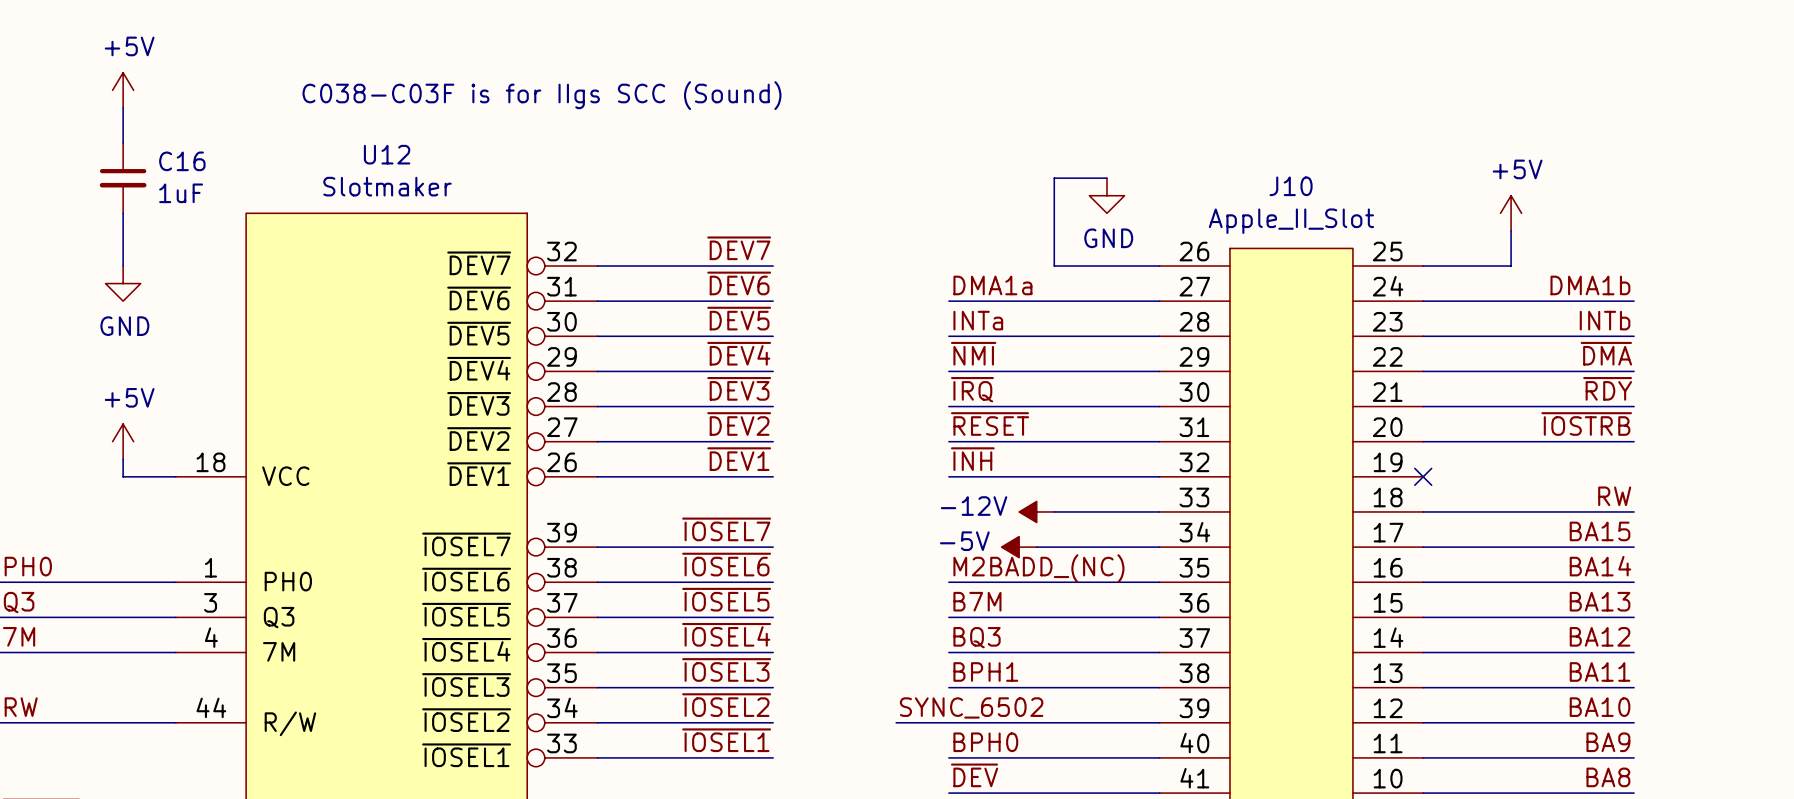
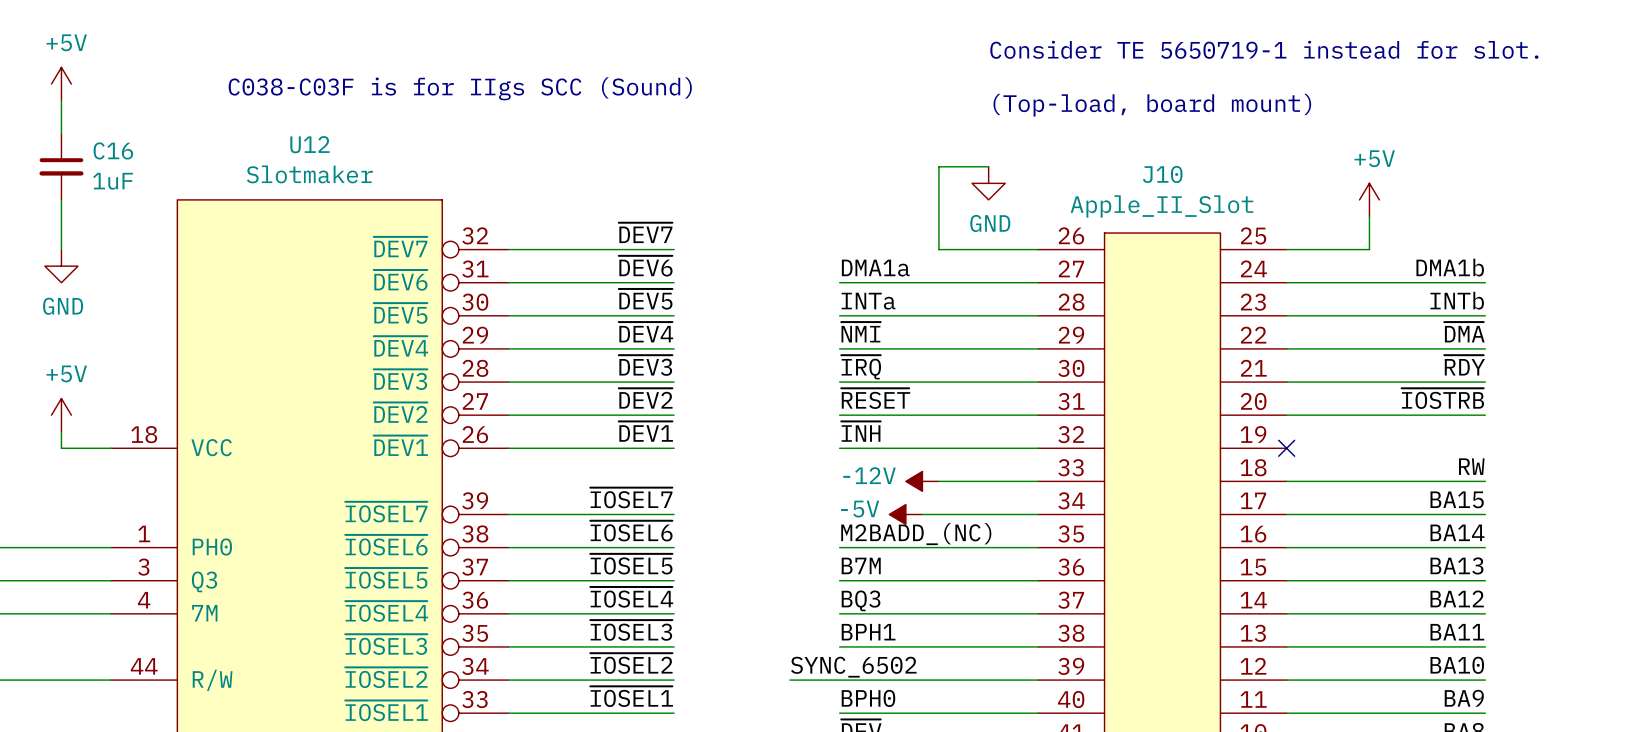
text: none -> Consider TE 5650719-1 instead for slot. (1264, 49)
text: none -> (Top-load, board mount) (1152, 105)

